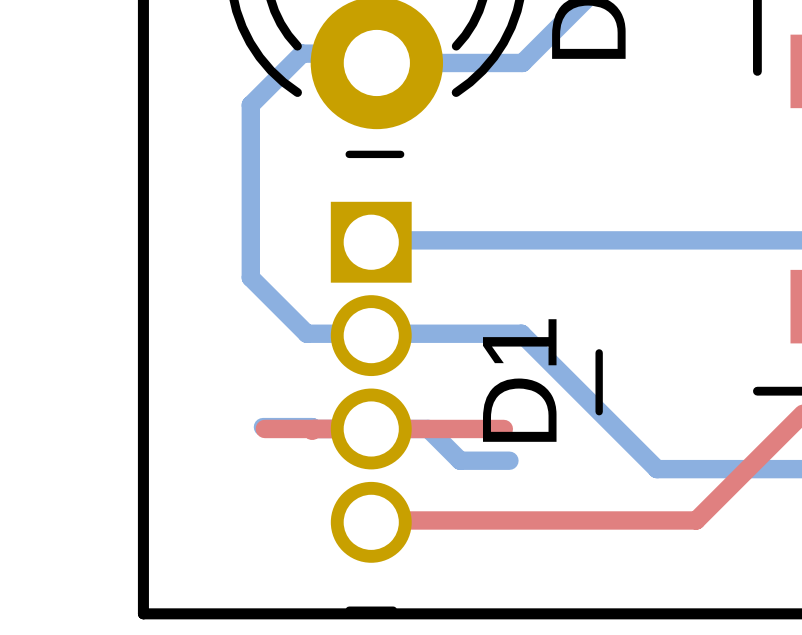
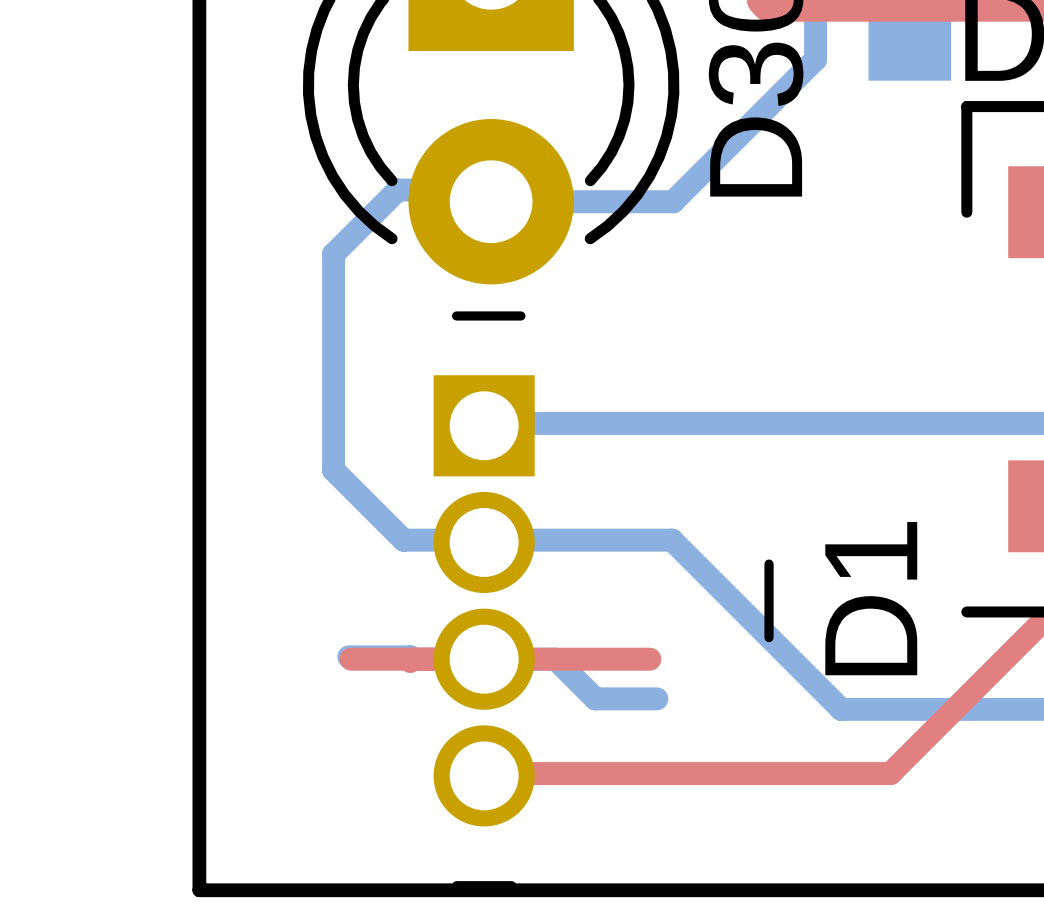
D1 name position: D1 (519, 380) -> D1 (871, 598)

